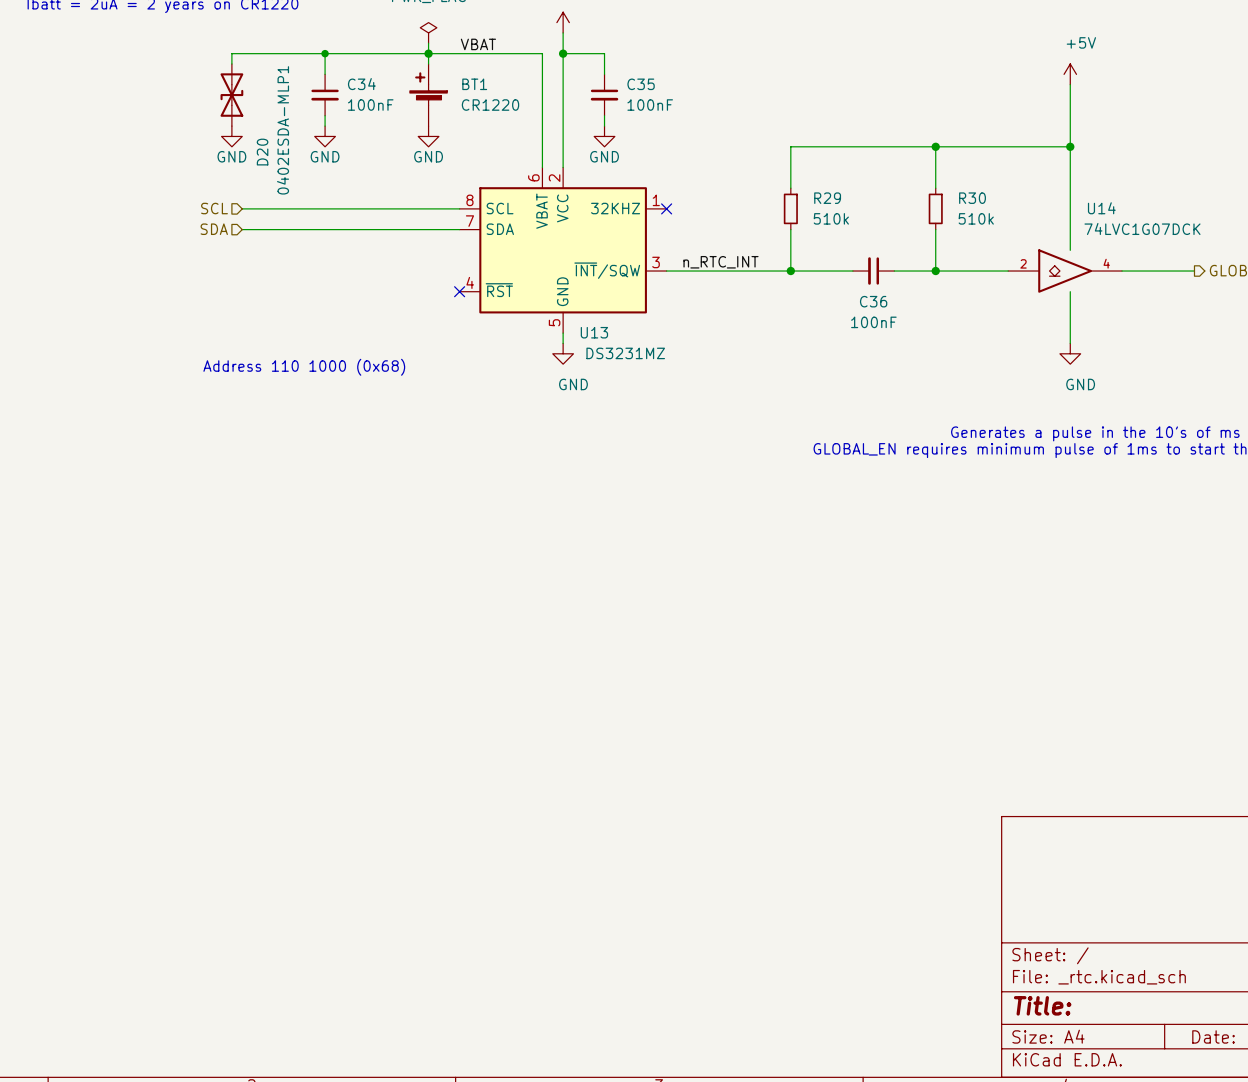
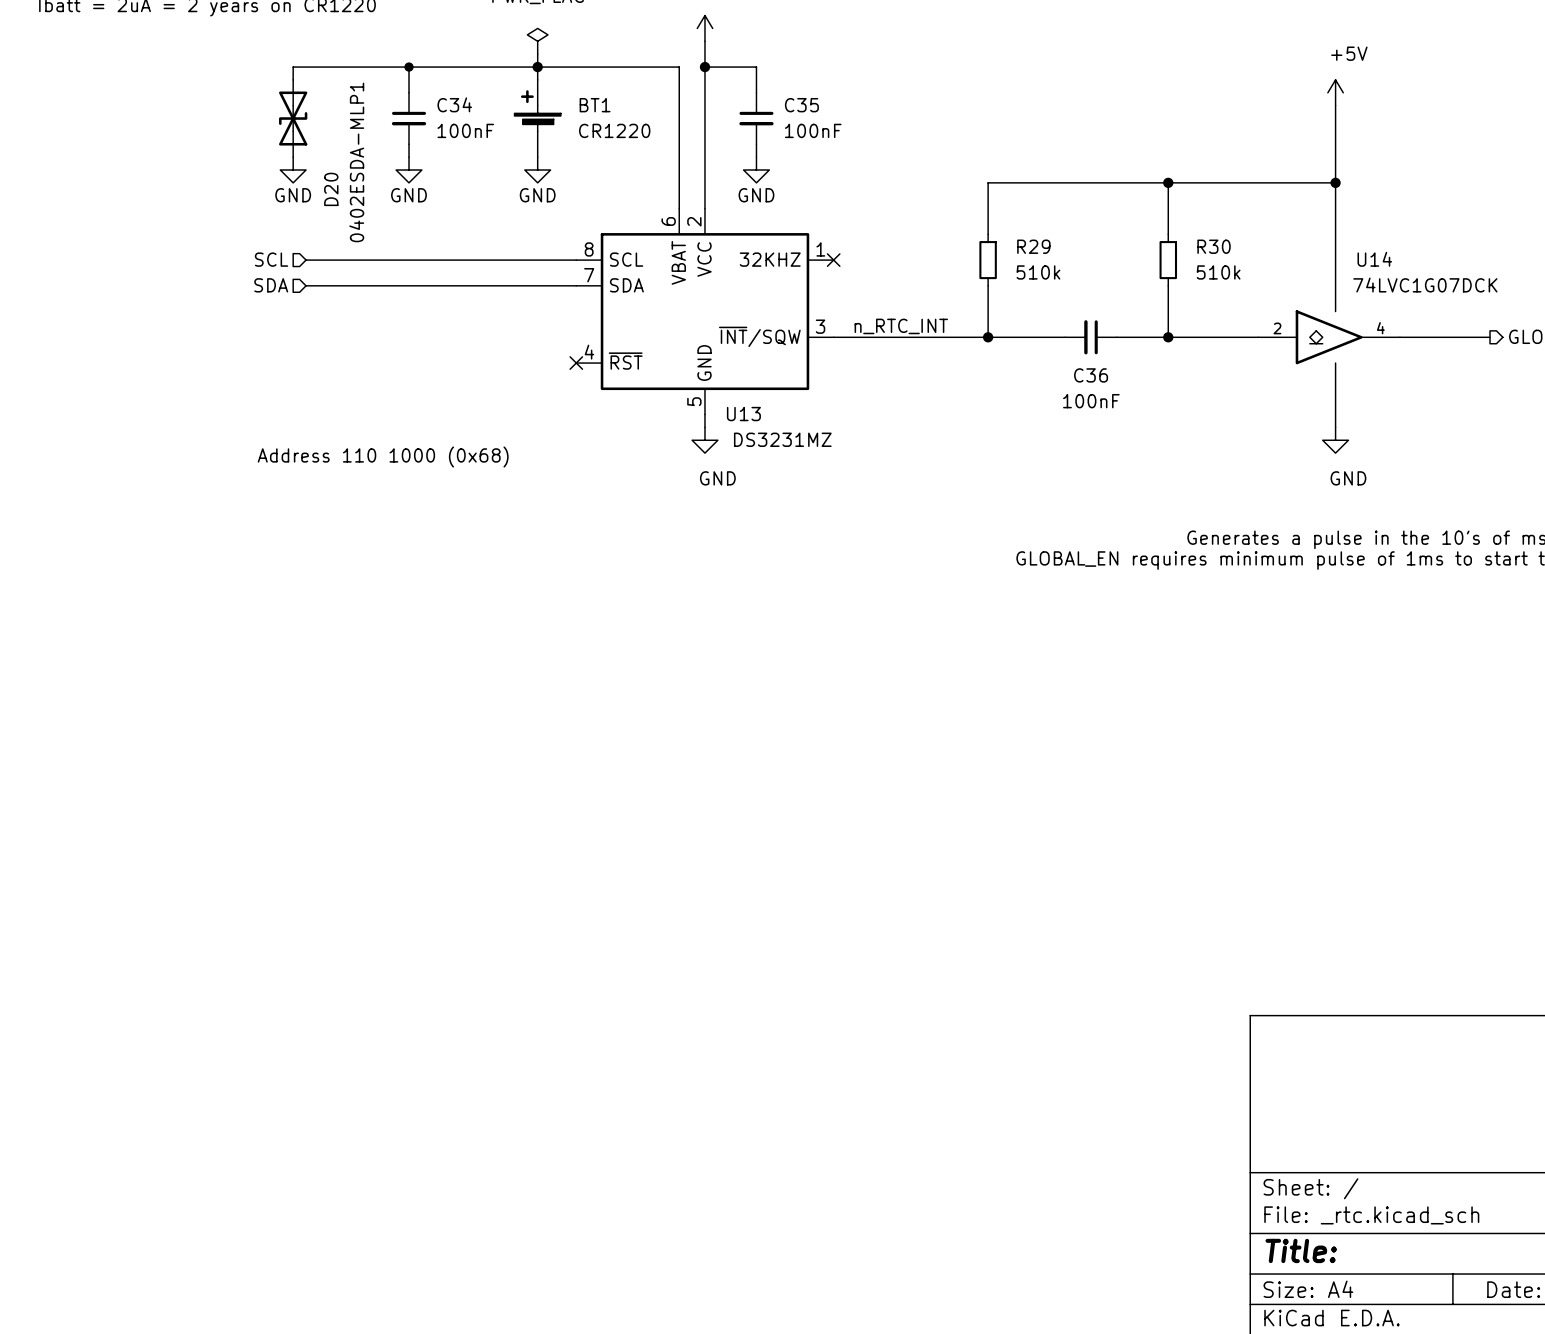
label: VBAT (478, 44) -> none

